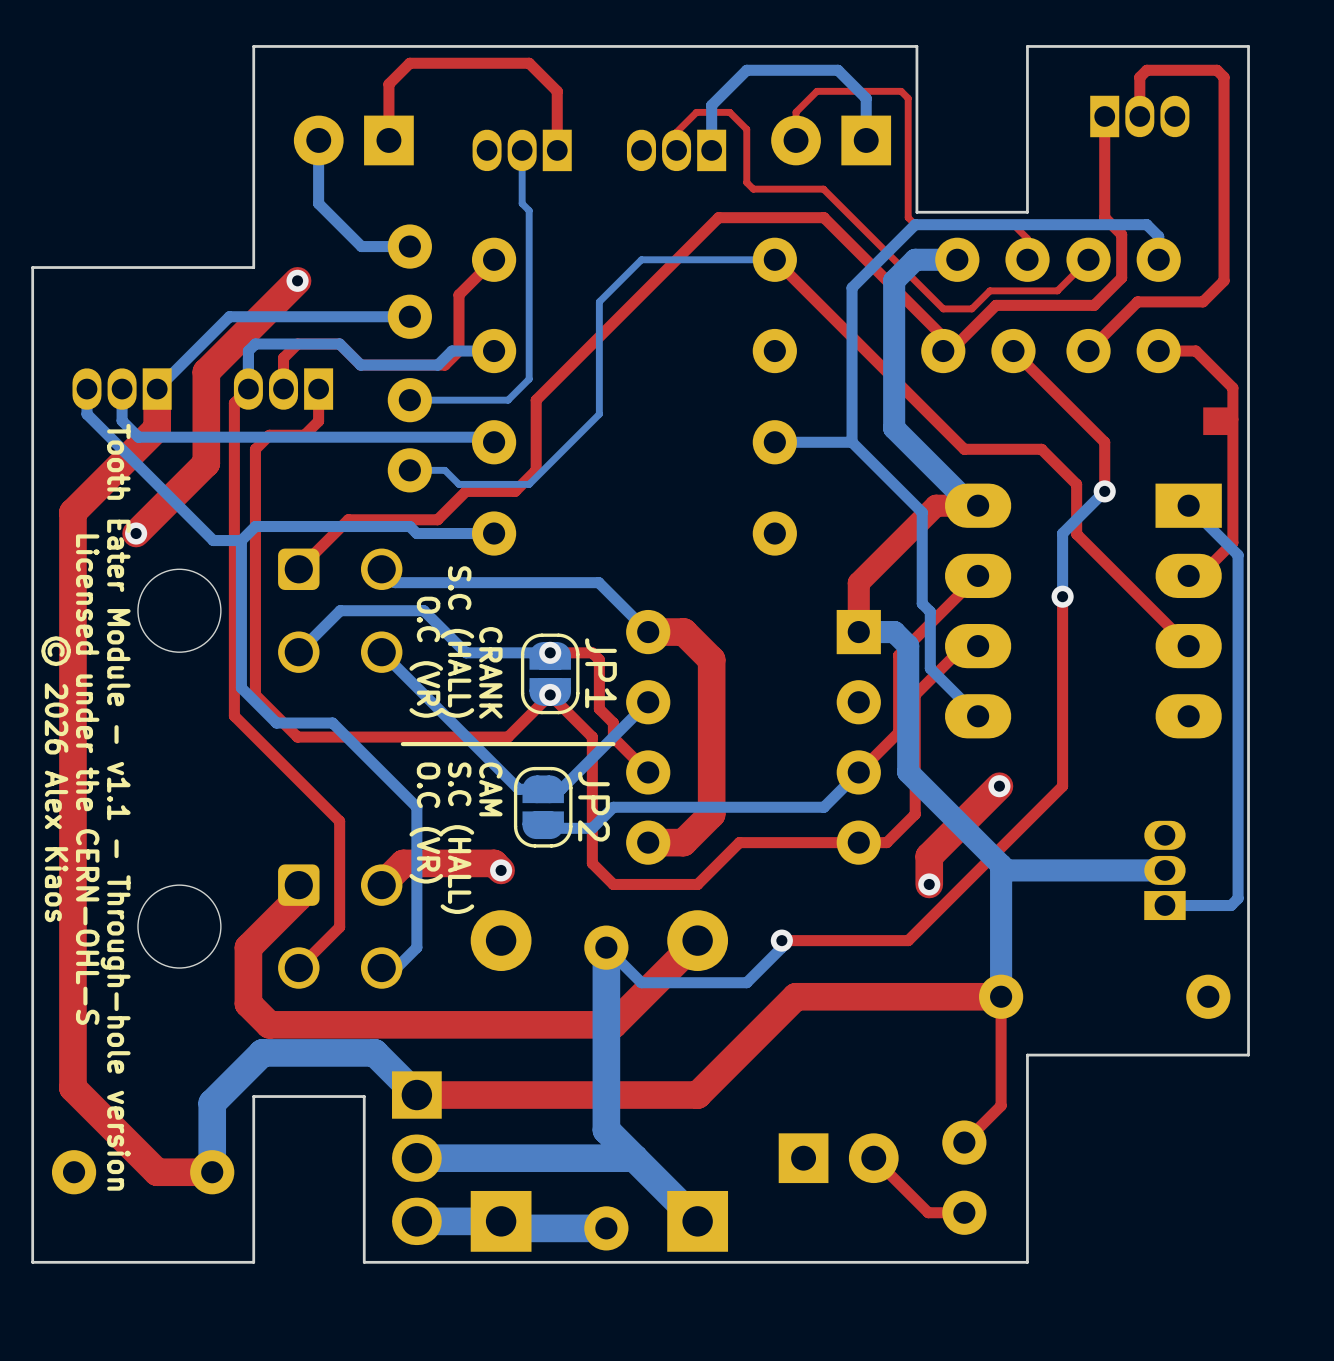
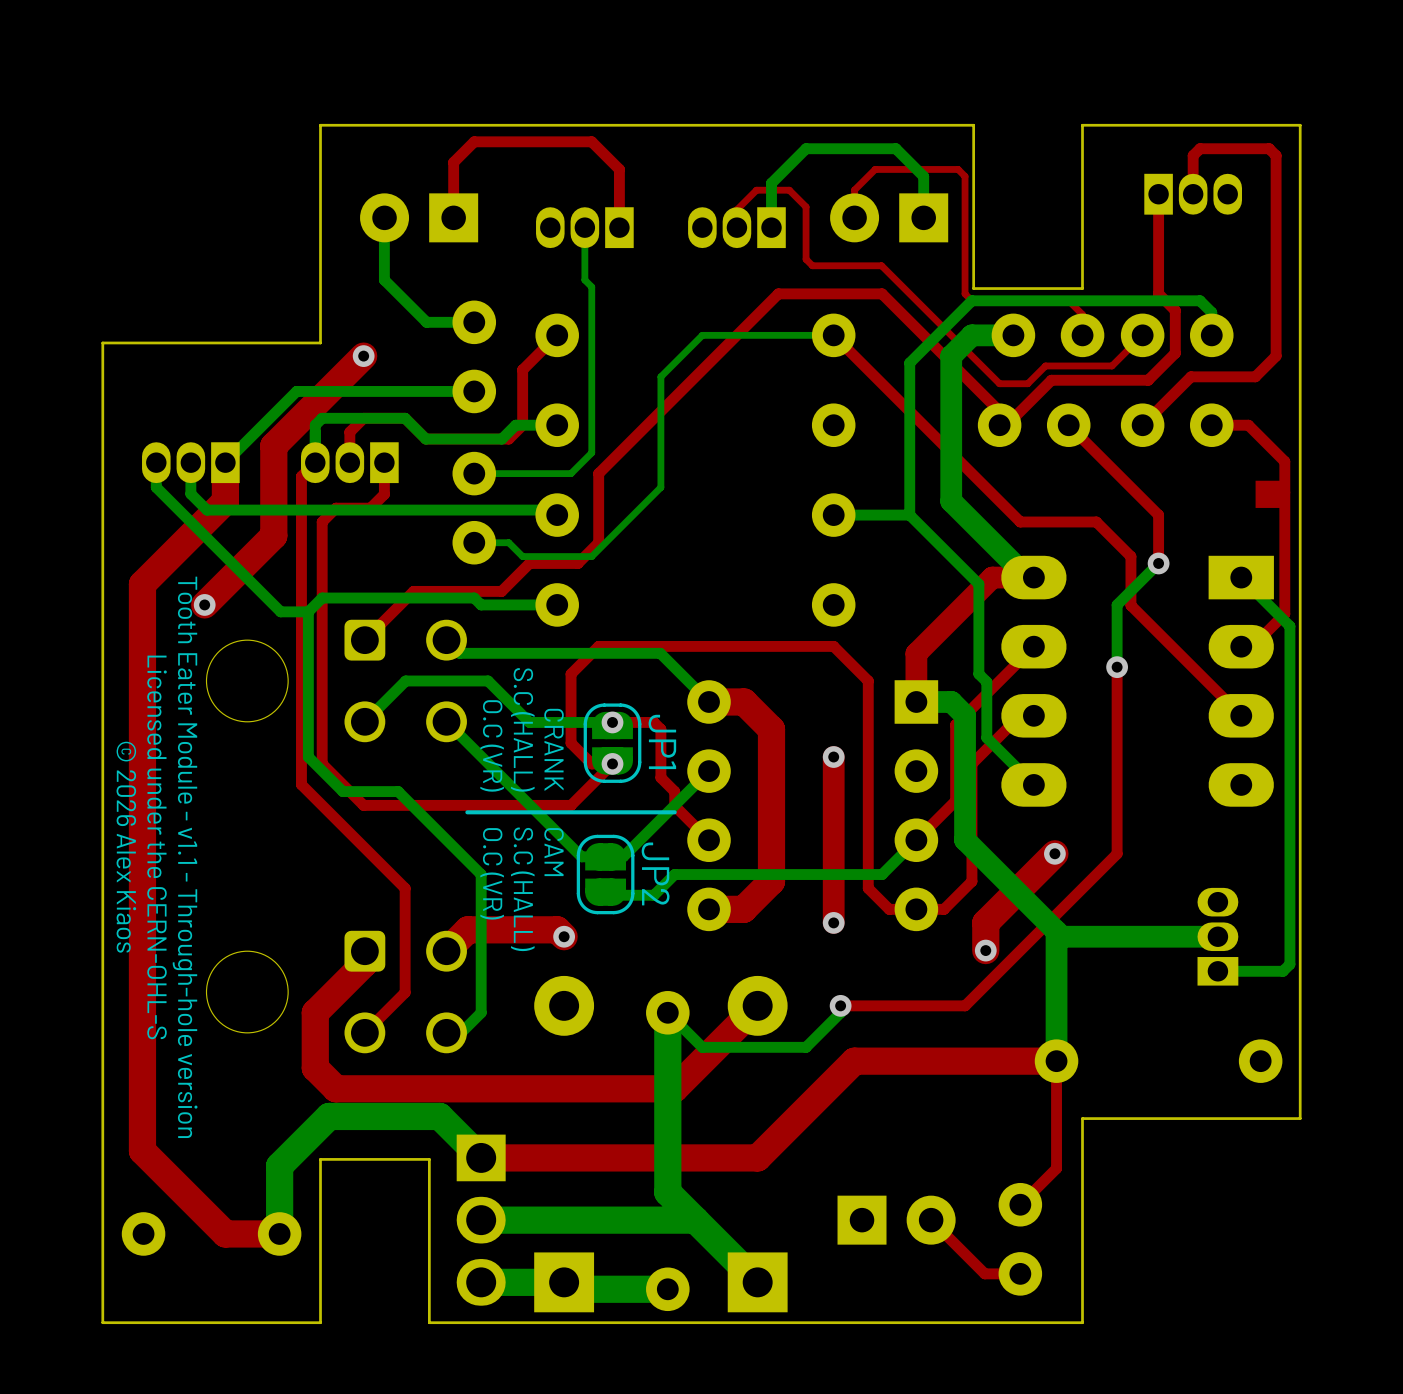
top track: none -> (833, 757) (833, 922)
via: none -> (833, 757)
top track: (550, 694) (592, 737) (592, 863) (613, 884) (697, 884) (739, 842) (831, 842) -> (612, 763) (591, 763) (571, 743) (571, 674) (598, 646) (833, 646) (868, 680) (868, 888) (889, 909)
via: none -> (833, 922)

